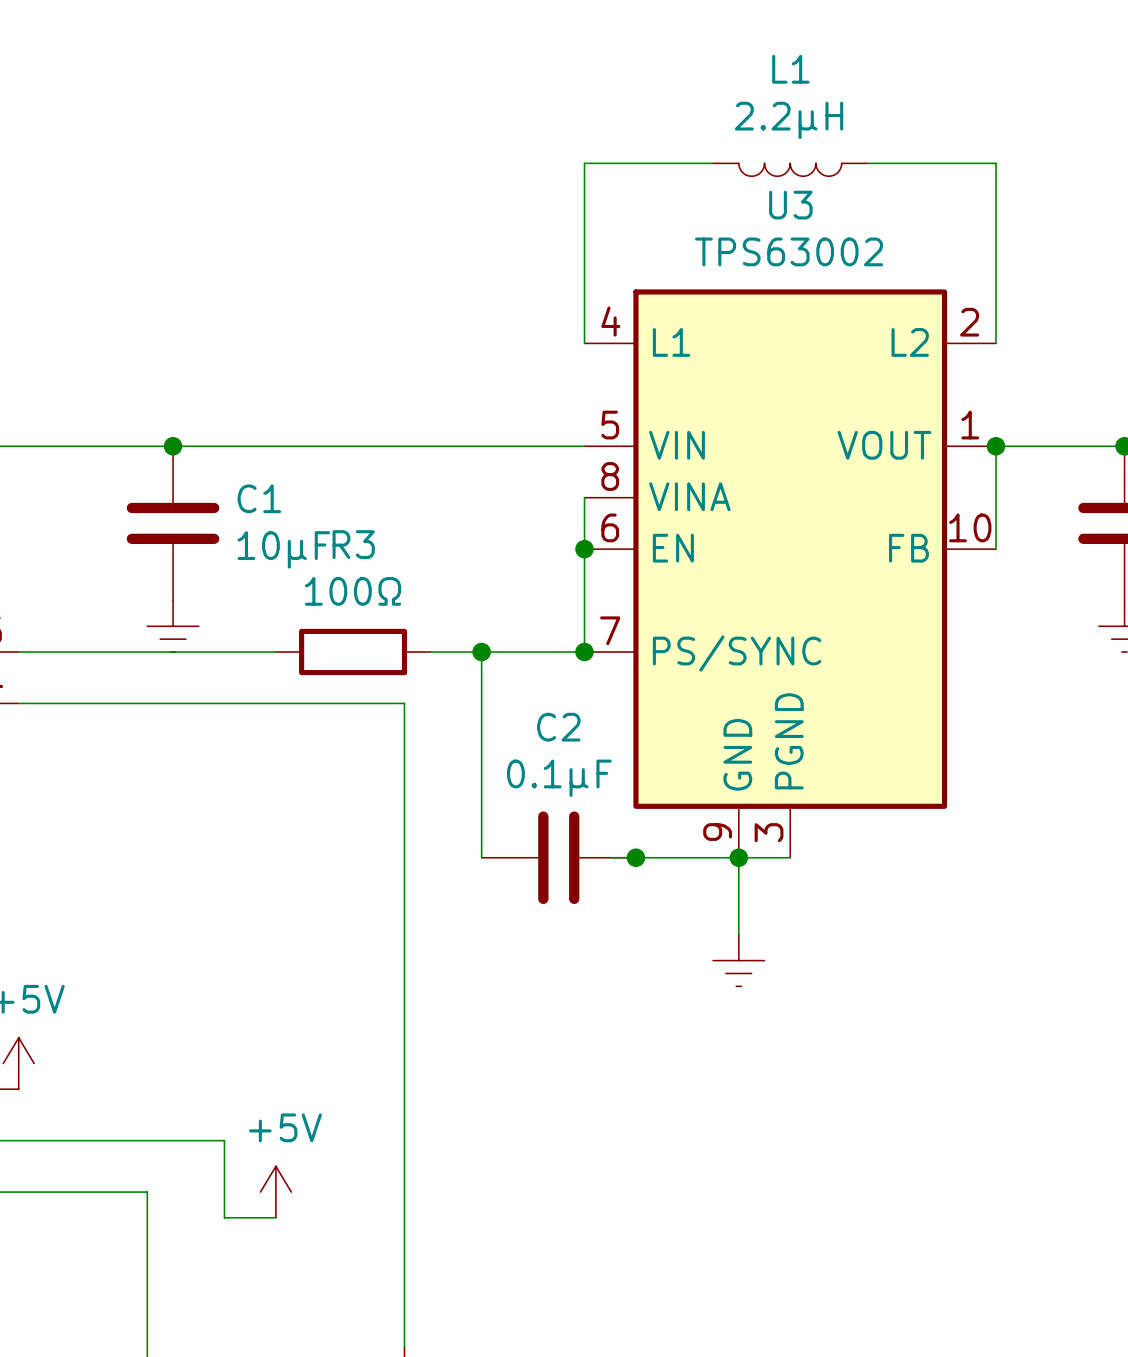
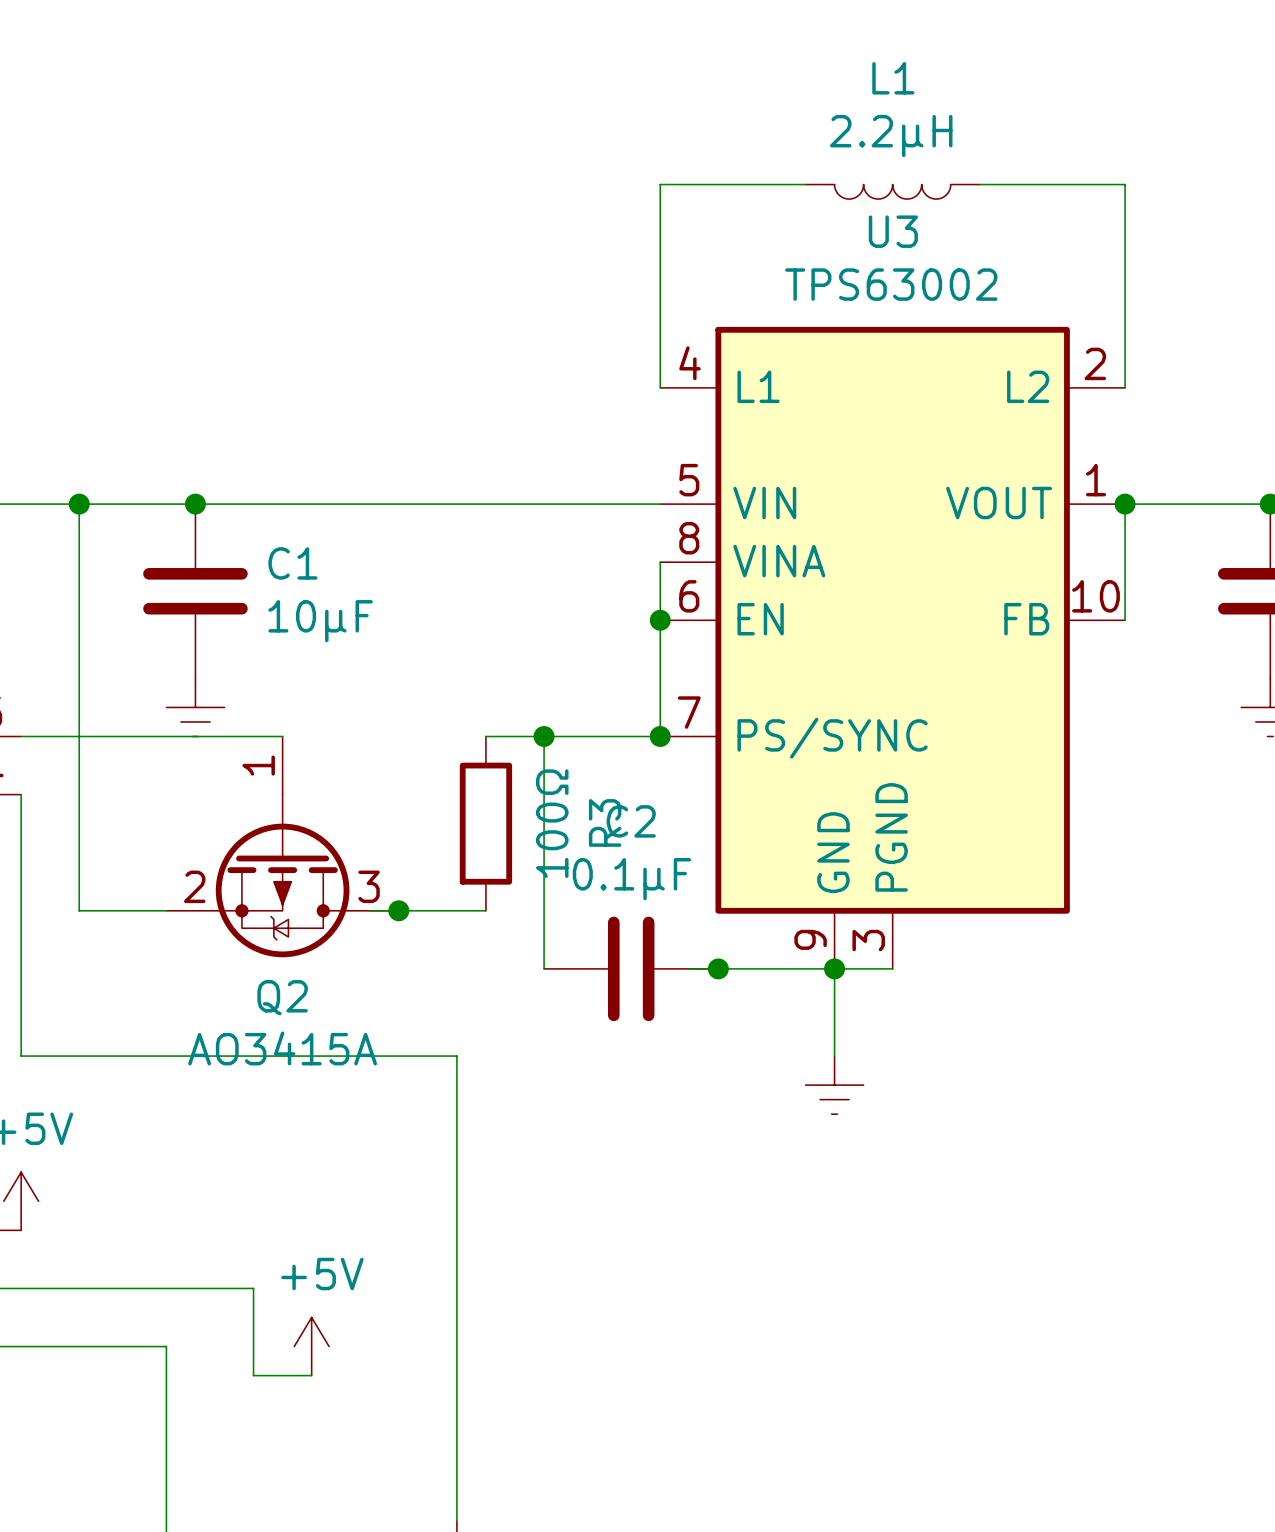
wire: none -> (79, 504) (79, 910) (166, 910)
junction: none -> (79, 504)
wire: (250, 652) (275, 652) -> none
R3 rotation: 0° (353, 652) -> 90° clockwise (485, 823)
R3 position: (353, 652) -> (485, 823)
wire: (18, 703) (404, 703) (404, 934) -> (21, 794) (21, 1056) (456, 1056)
Q2: none -> AO3415A (282, 846)
wire: none -> (369, 910) (485, 910)
junction: none -> (398, 910)

